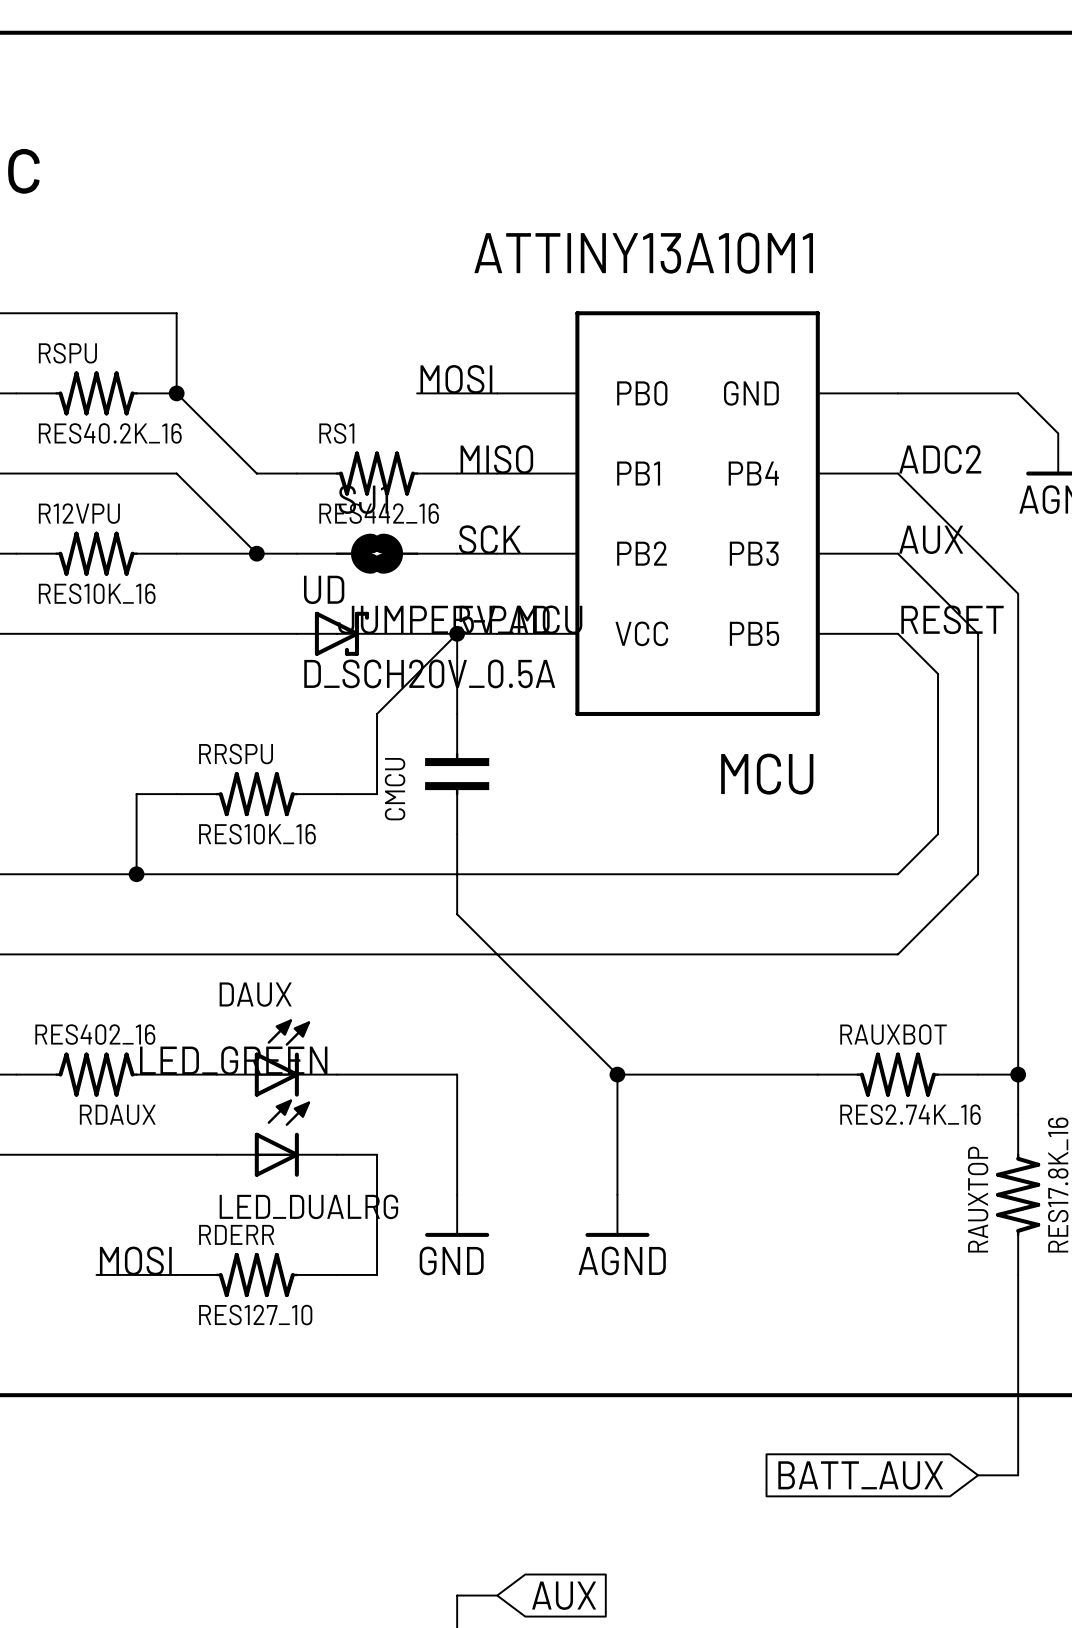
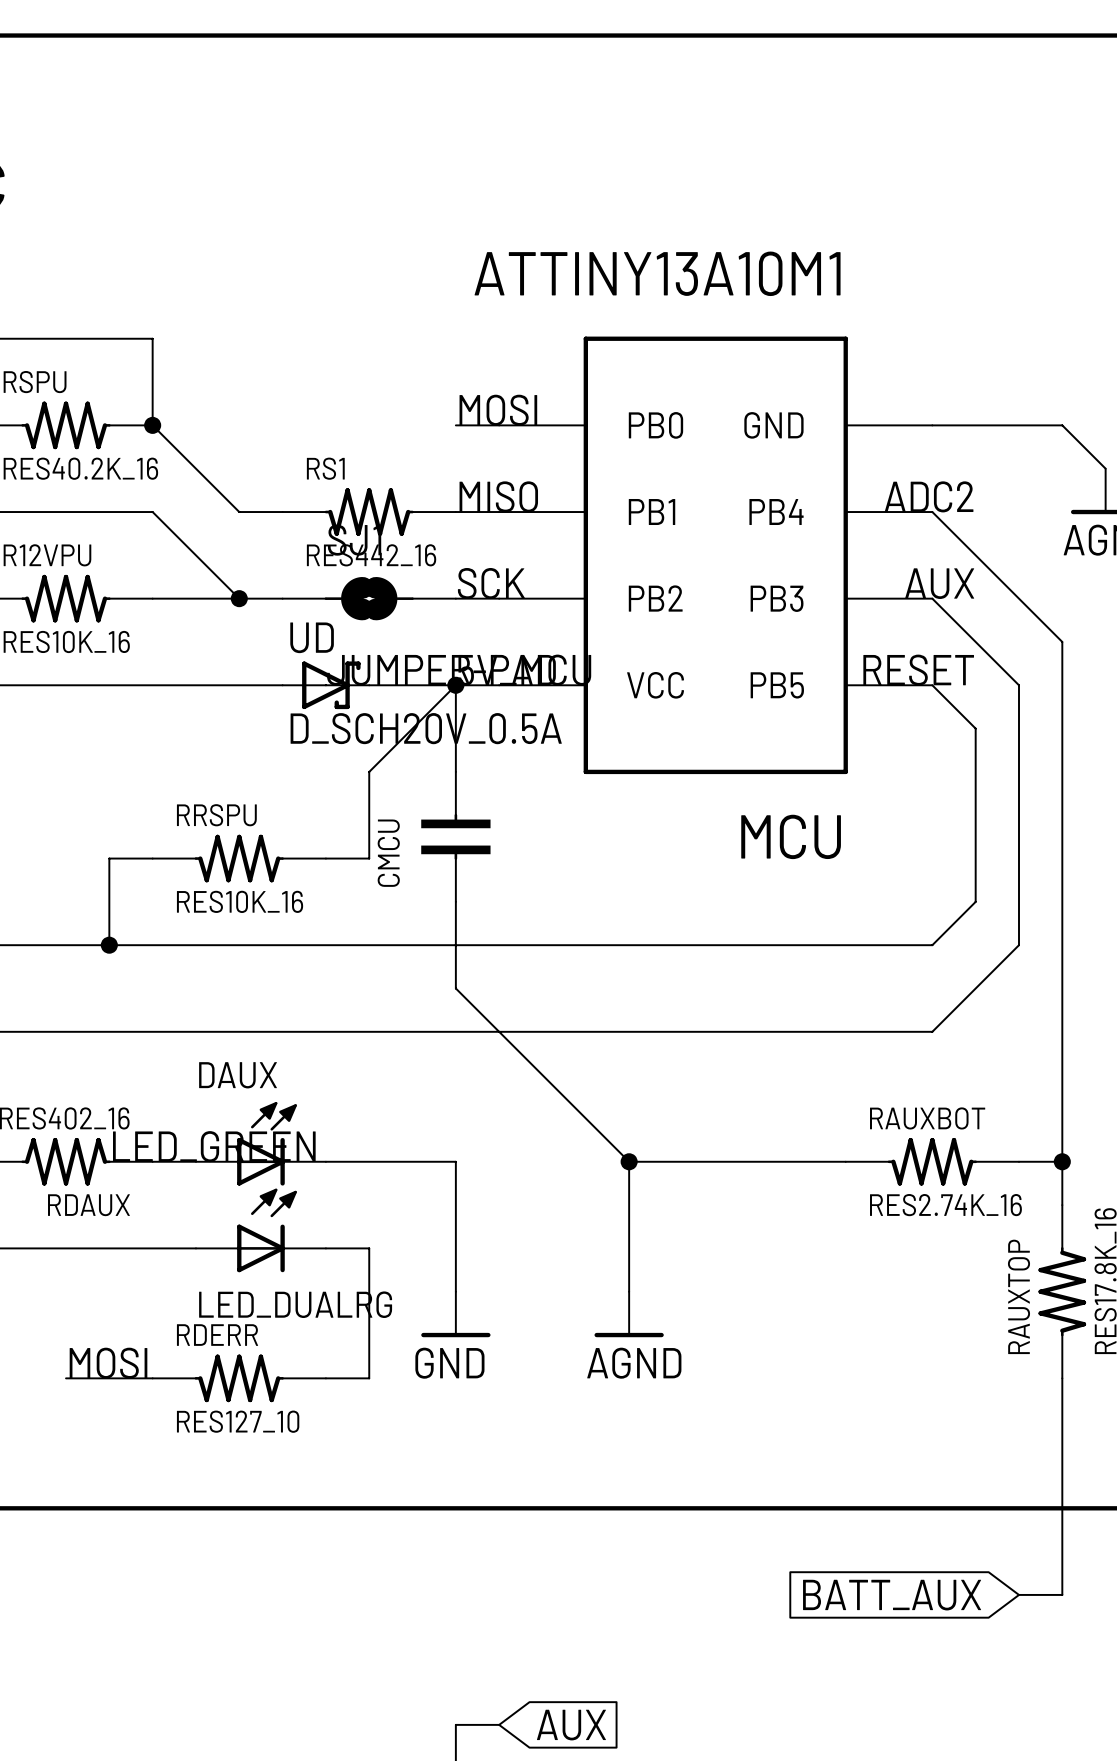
label position: MOSI (456, 379) -> MOSI (498, 410)
wire: (417, 393) (457, 393) -> none
label position: ADC2 (940, 459) -> ADC2 (929, 496)
label position: AUX (931, 539) -> AUX (939, 583)
label position: RESET (952, 619) -> RESET (918, 670)

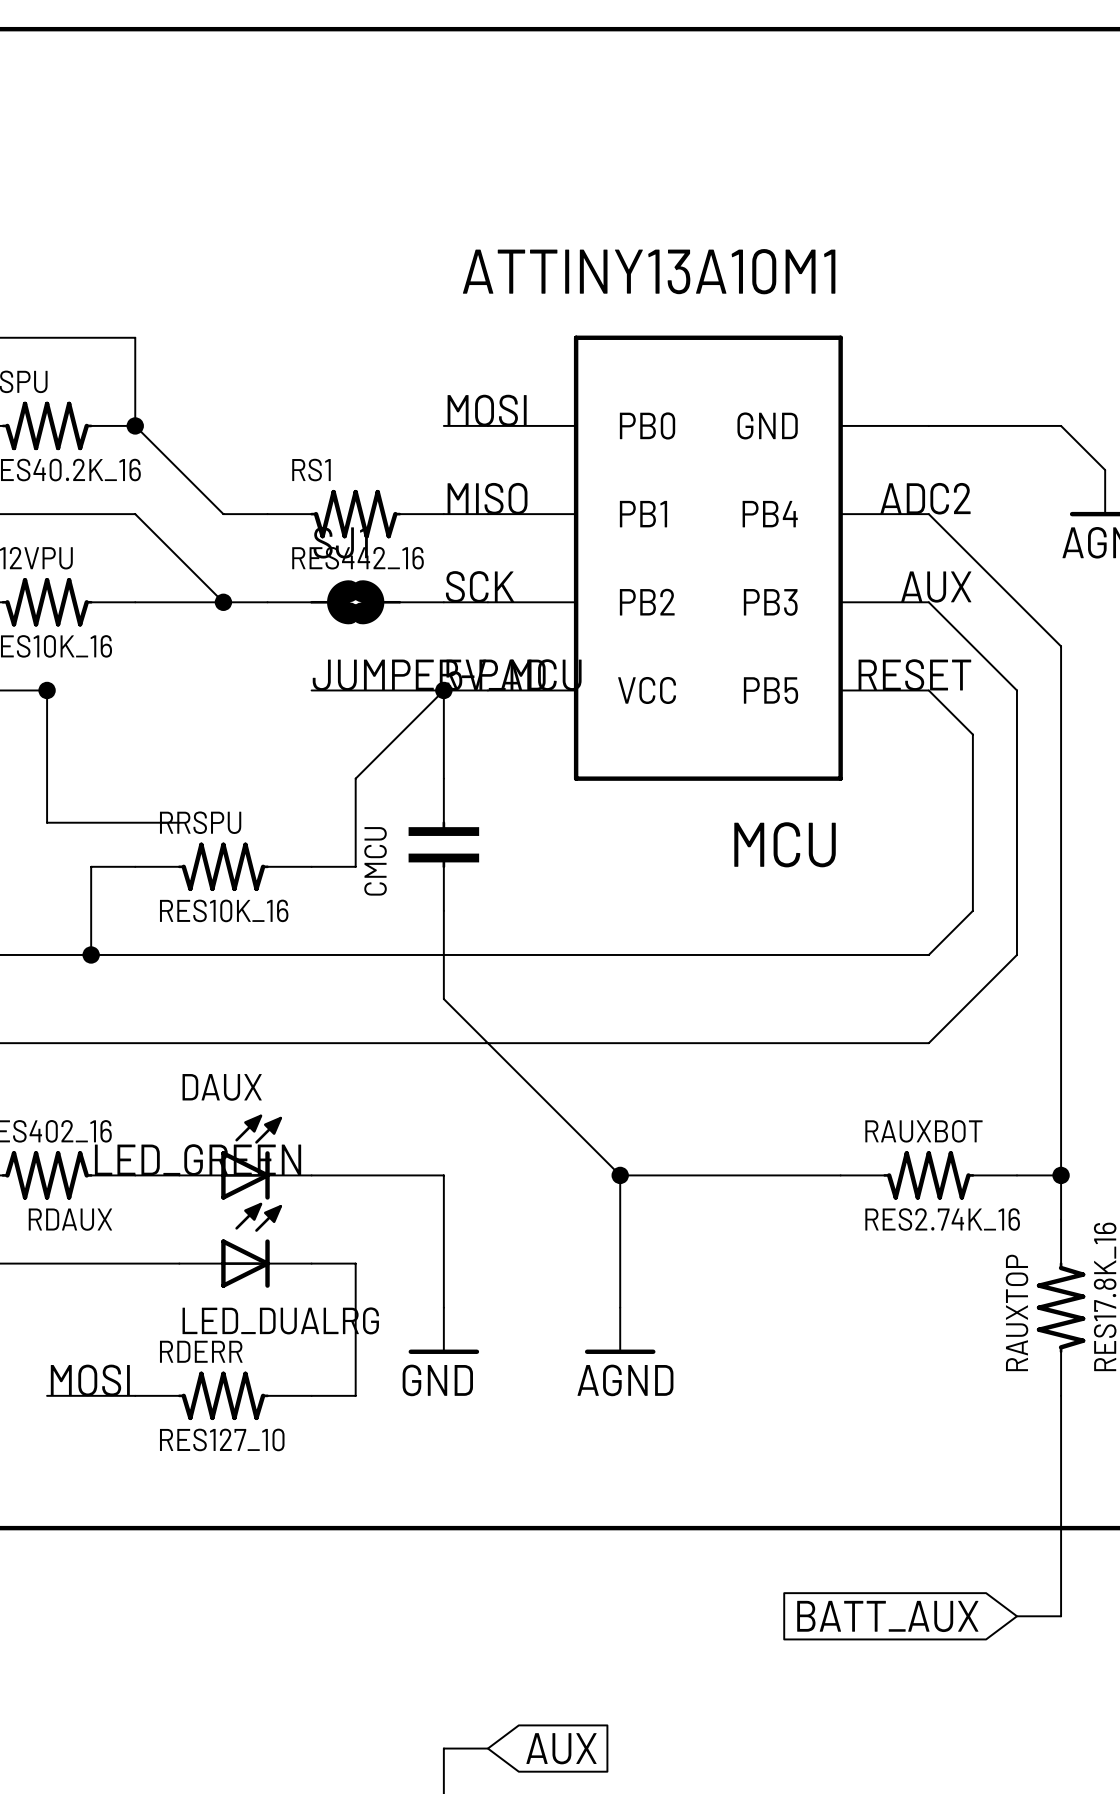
wire: (66, 685) (282, 685) -> (47, 690) (47, 822) (179, 822)
junction: none -> (47, 690)
UD: D_SCH20V_0.5A (325, 685) -> none

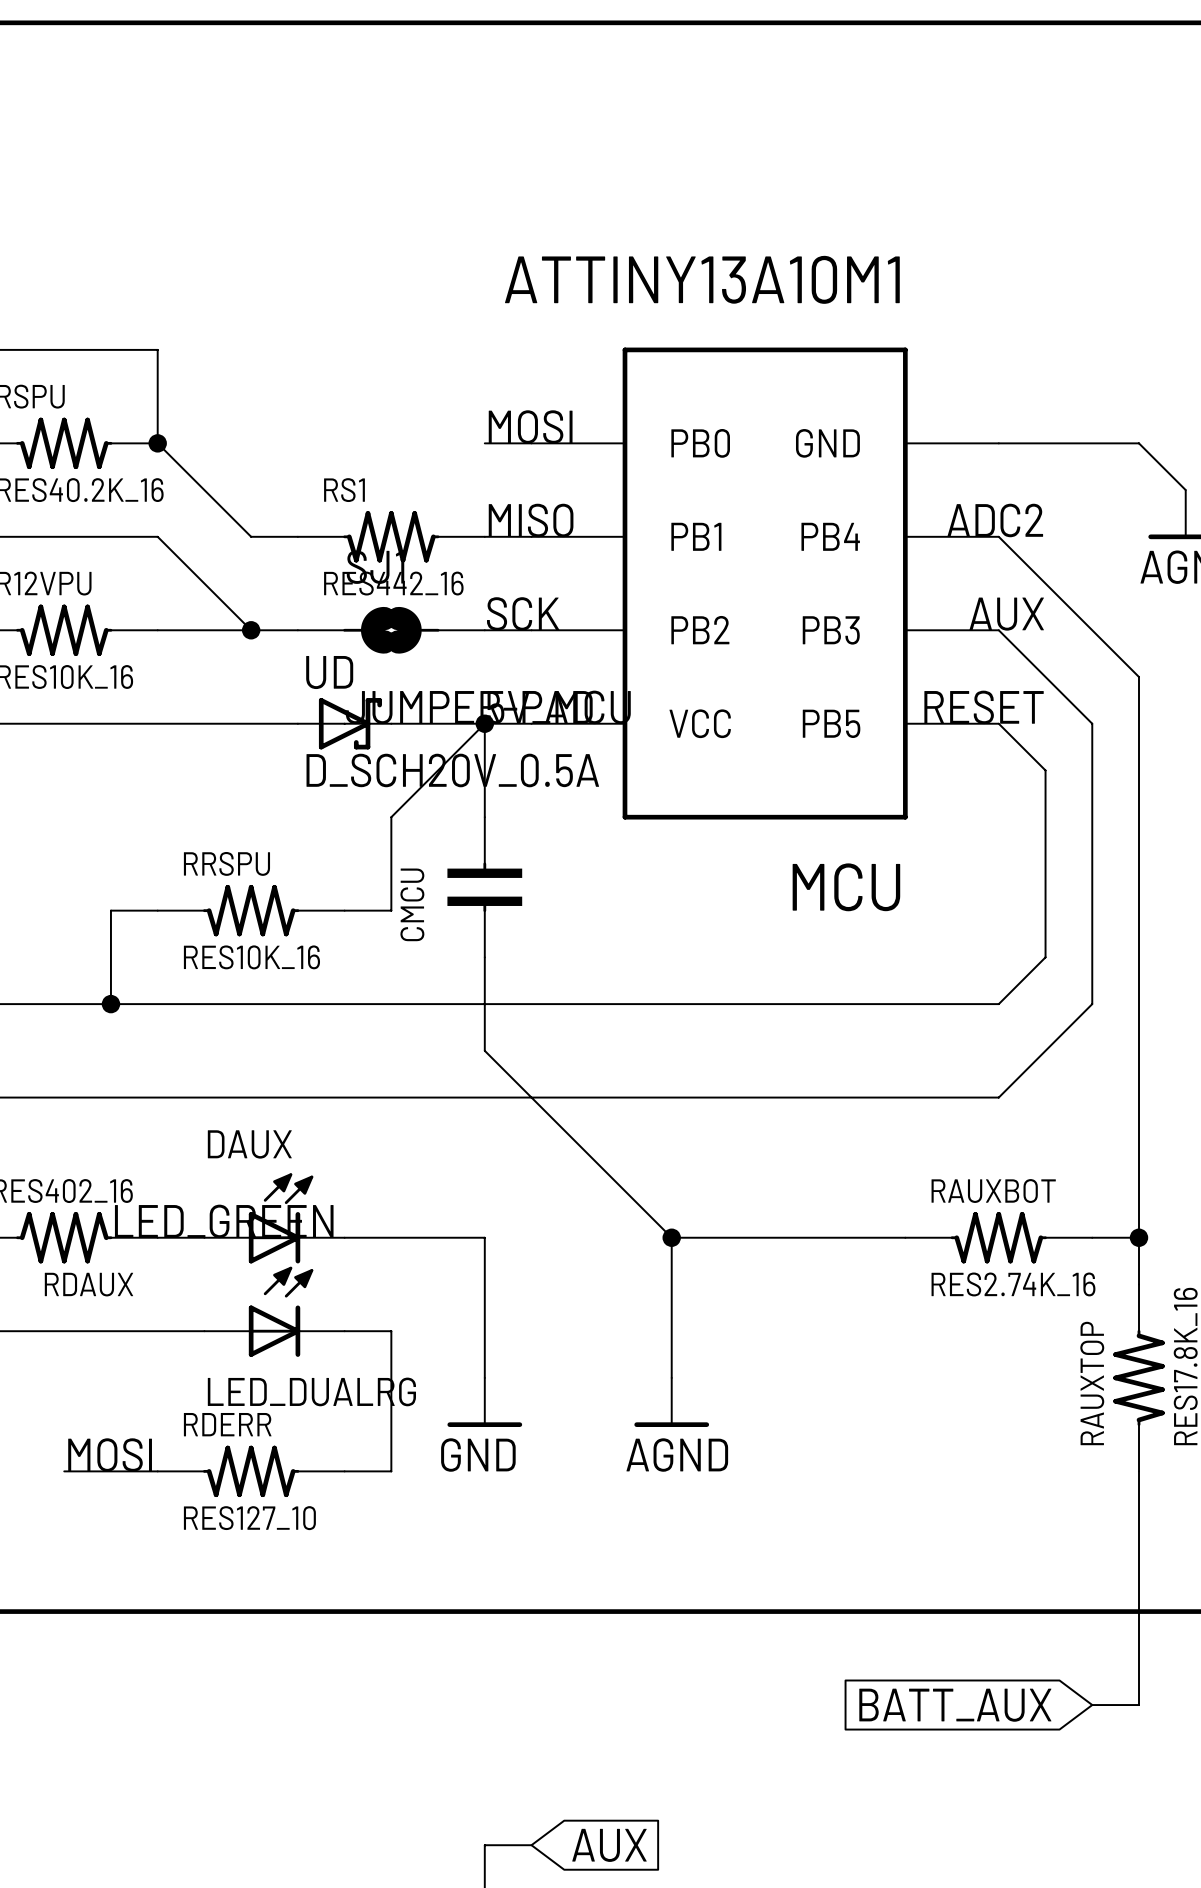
wire: (47, 690) (47, 822) (179, 822) -> (64, 723) (297, 723)
junction: (47, 690) -> none
UD: none -> D_SCH20V_0.5A (344, 723)

